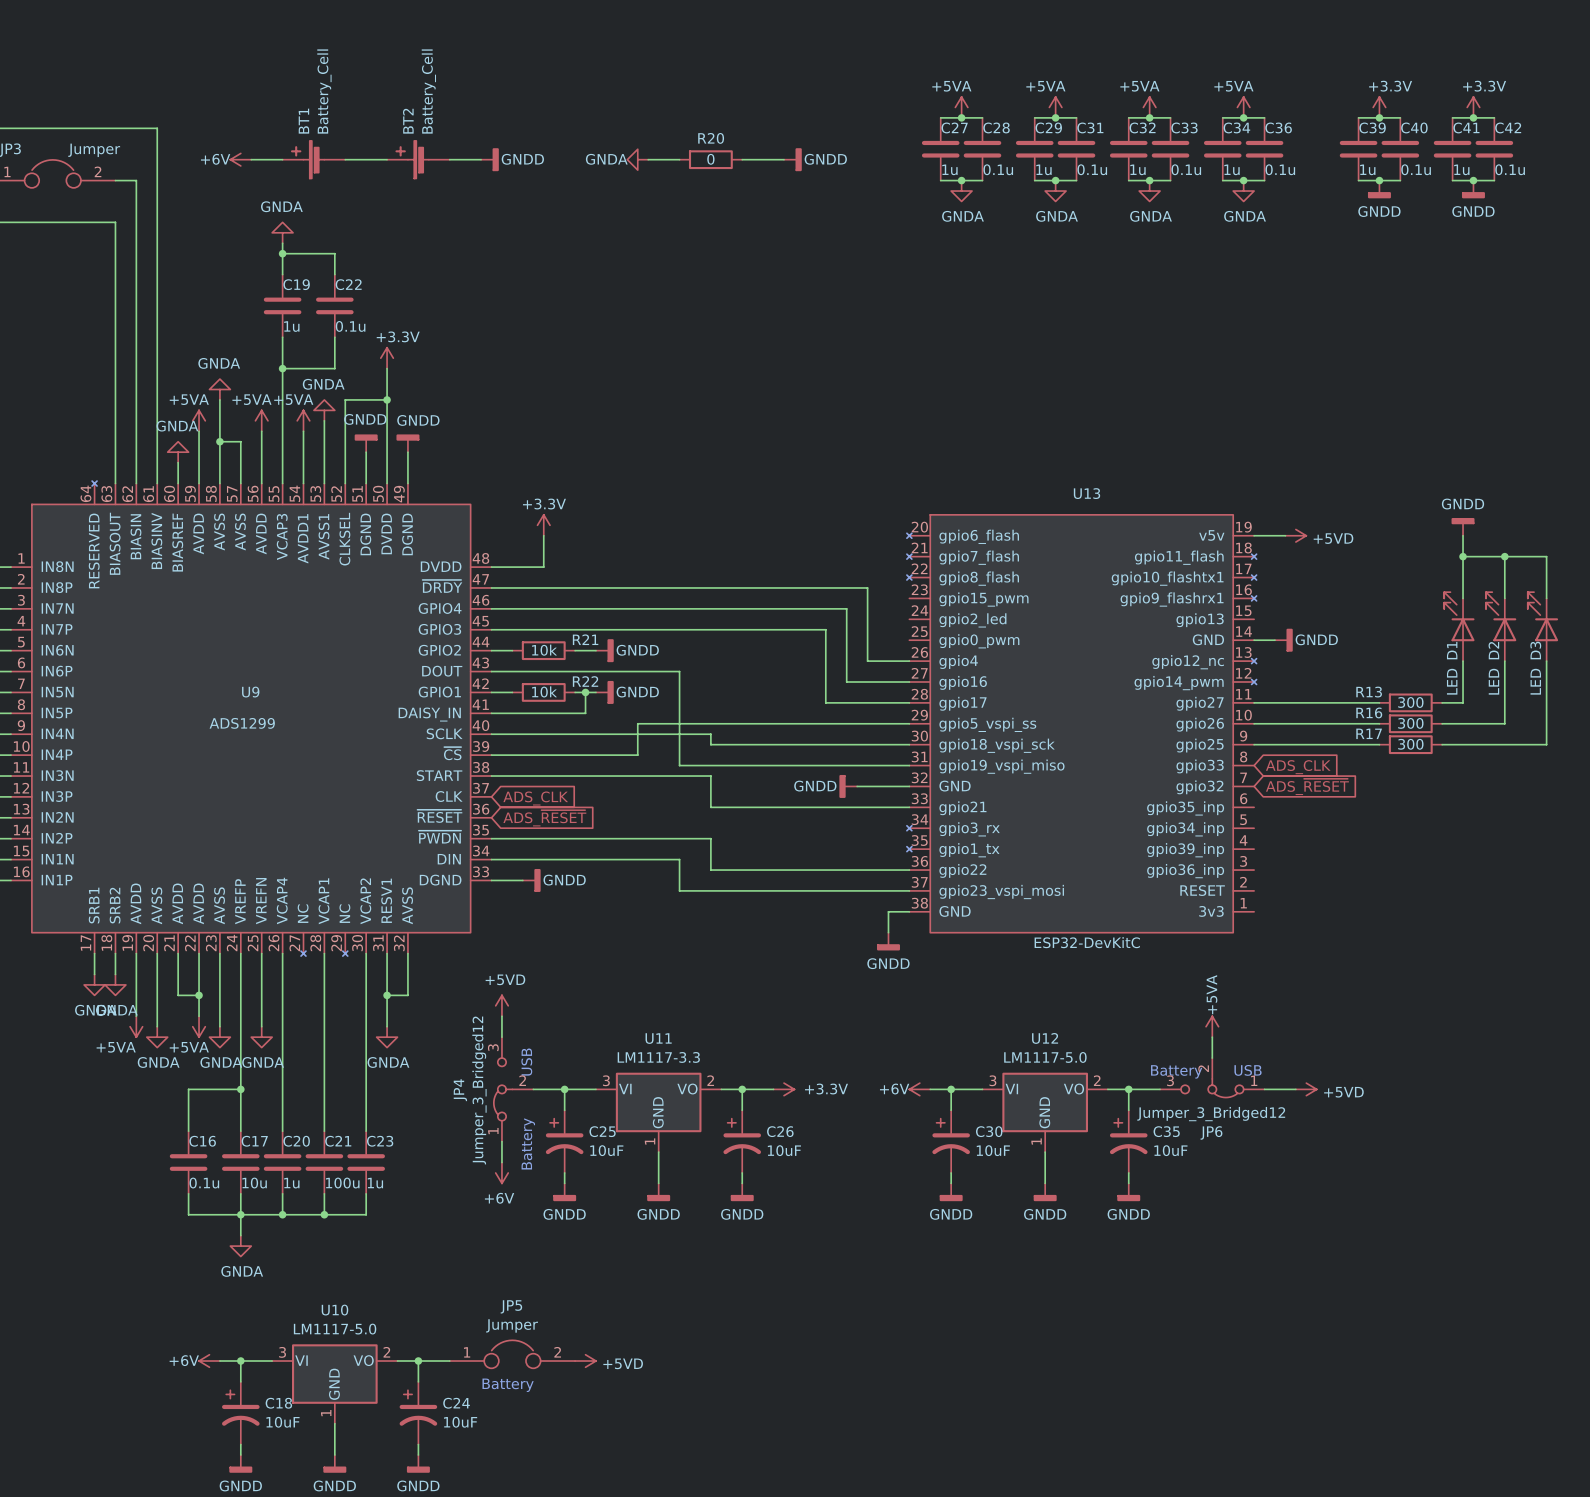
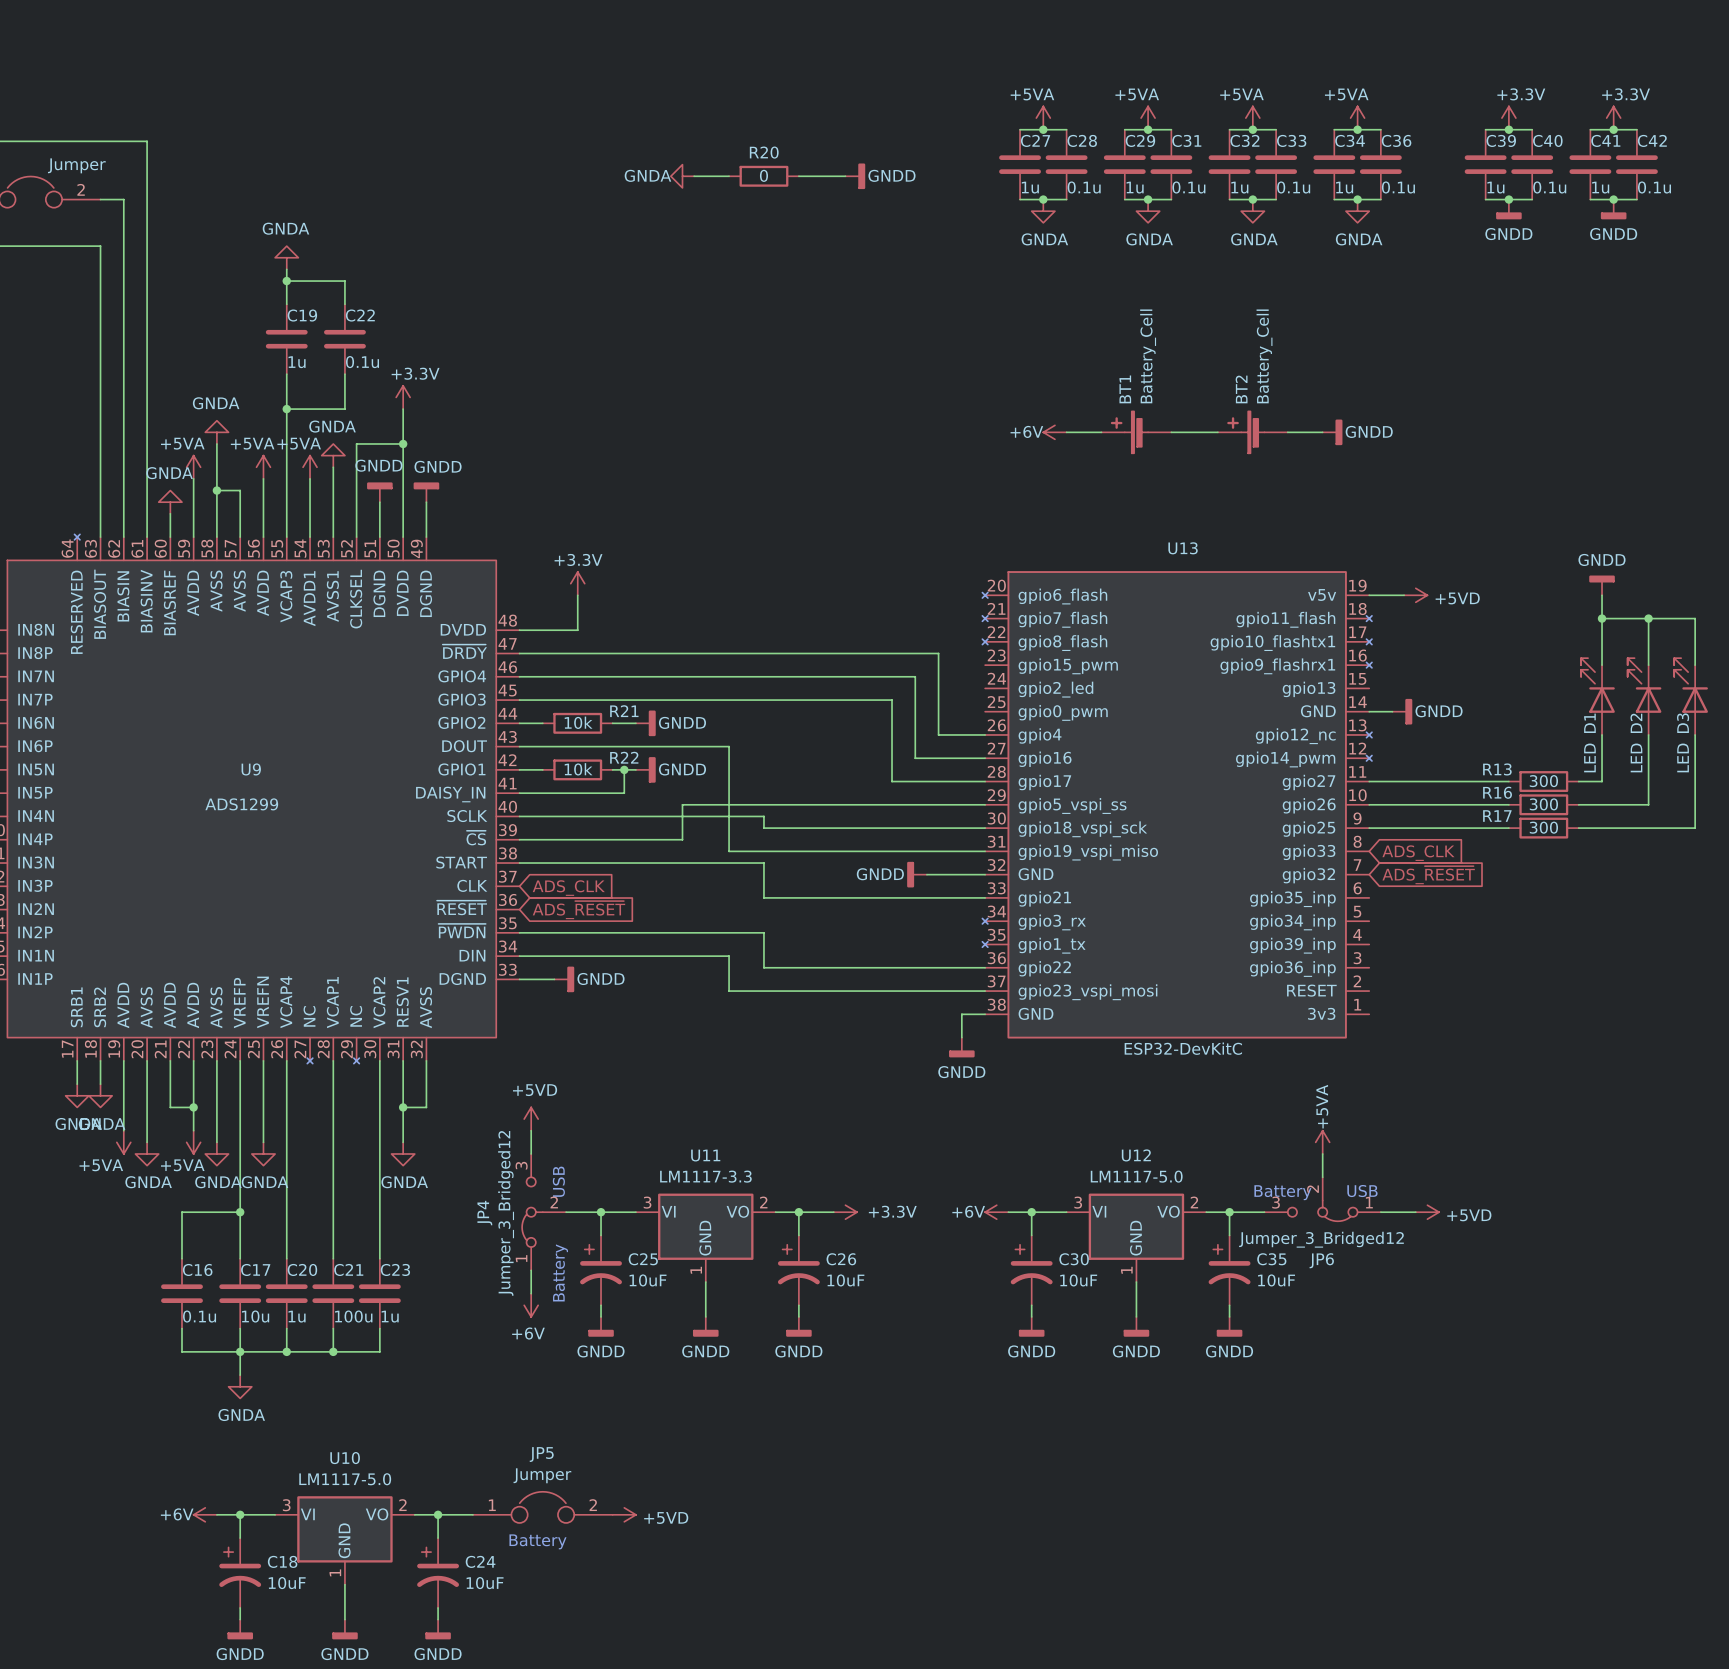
power symbol: +6V (240, 159) -> none
wire: (251, 159) (282, 159) -> none
BT1 position: (313, 159) -> (1136, 432)
wire: (345, 159) (387, 159) -> none
BT2 position: (418, 159) -> (1252, 432)
wire: (449, 159) (481, 159) -> none
power symbol: GNDD (489, 159) -> none
power symbol: none -> +6V (1054, 432)
wire: none -> (1066, 432) (1101, 432)
wire: none -> (1171, 432) (1217, 432)
wire: none -> (1287, 432) (1322, 432)
power symbol: none -> GNDD (1332, 432)

